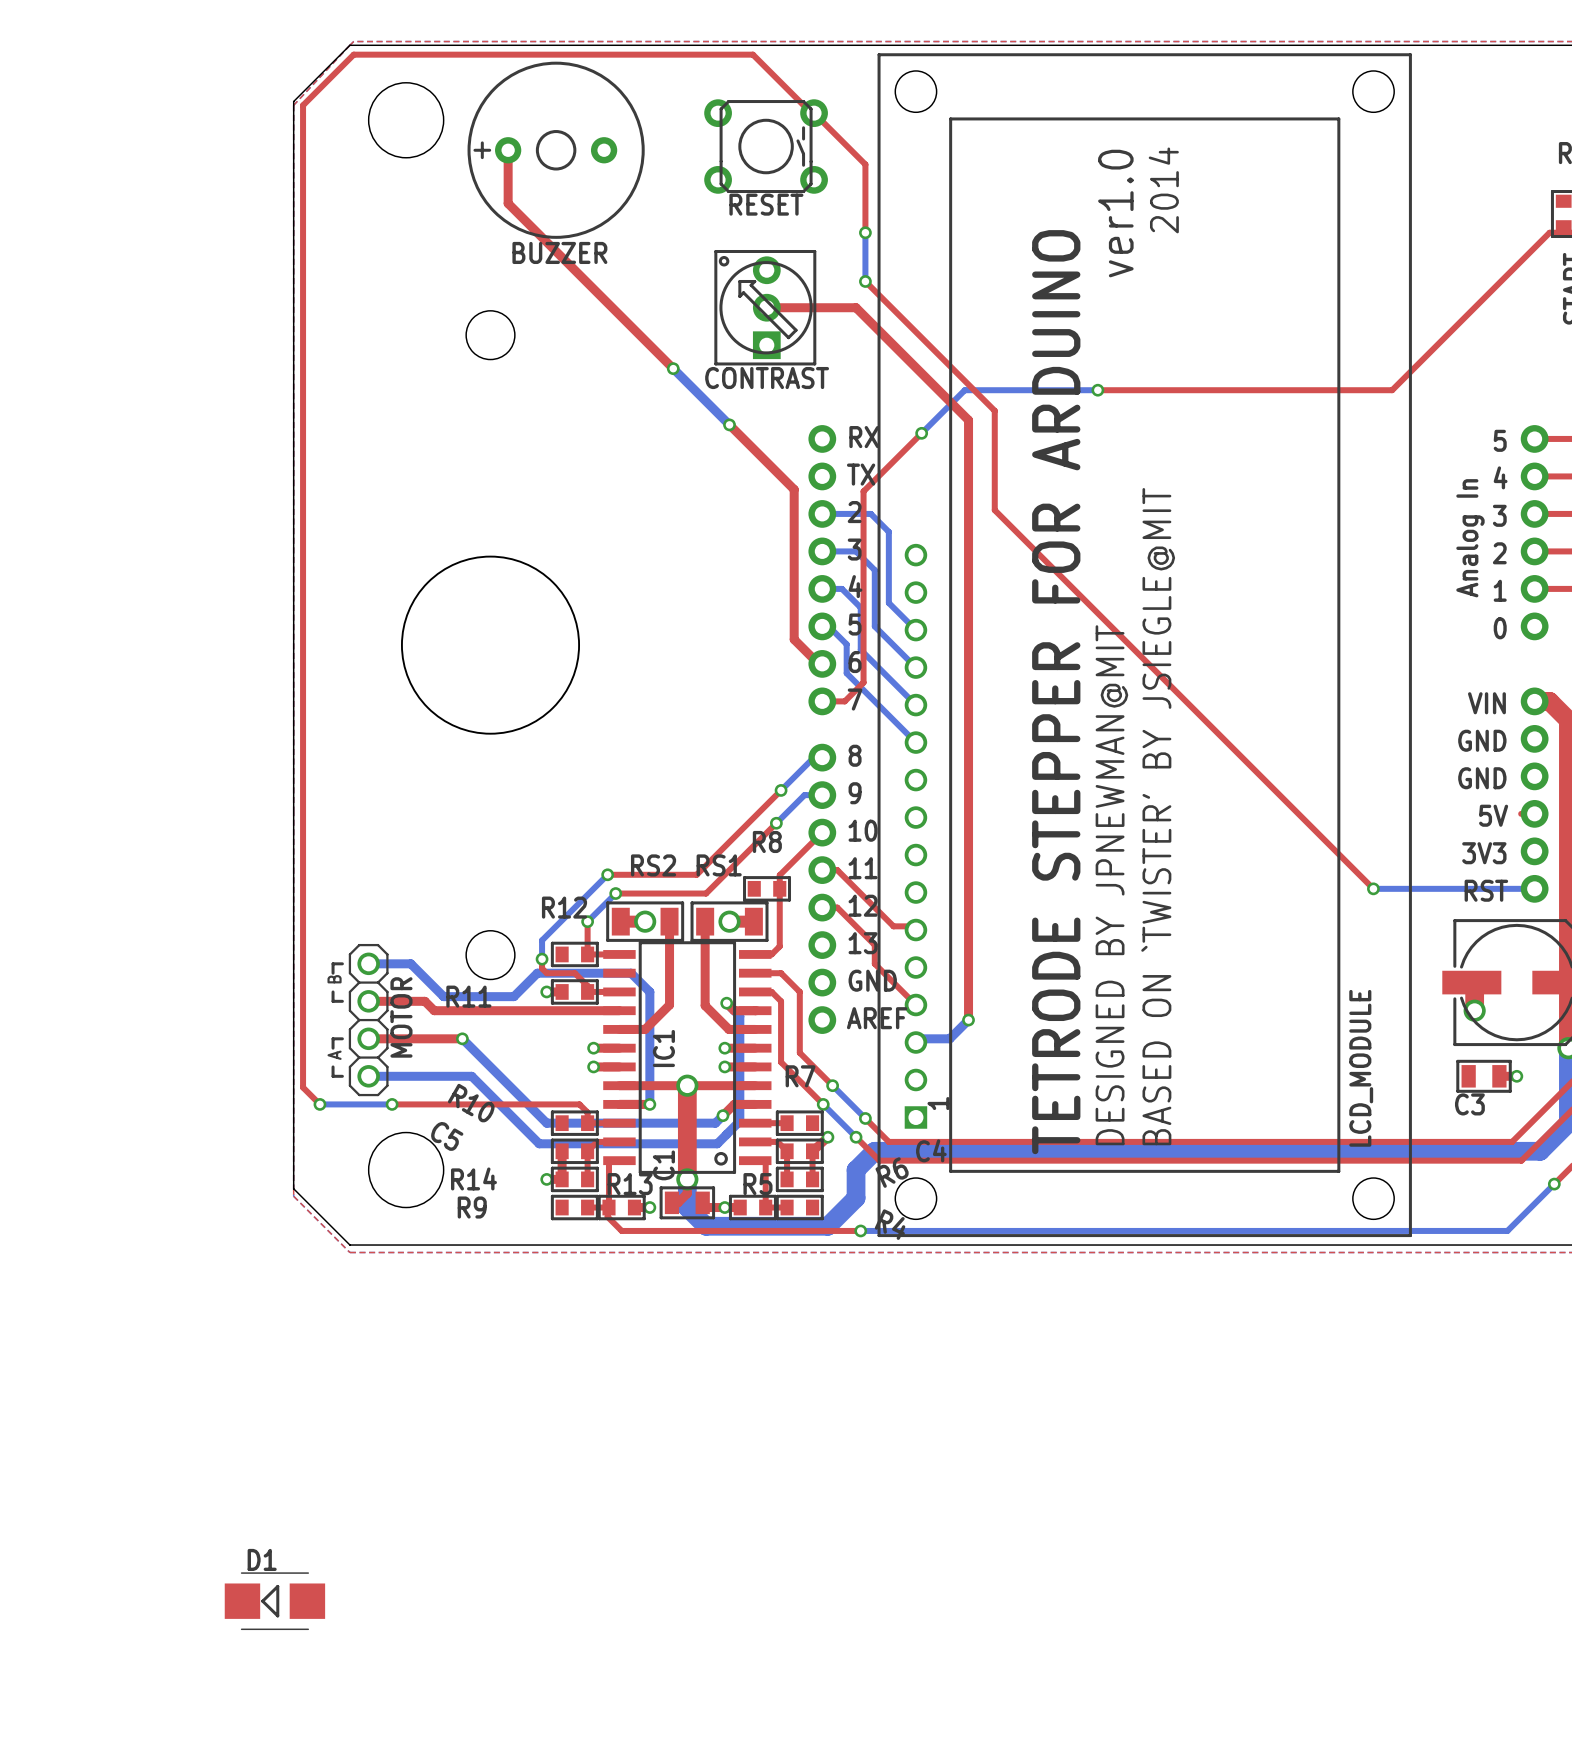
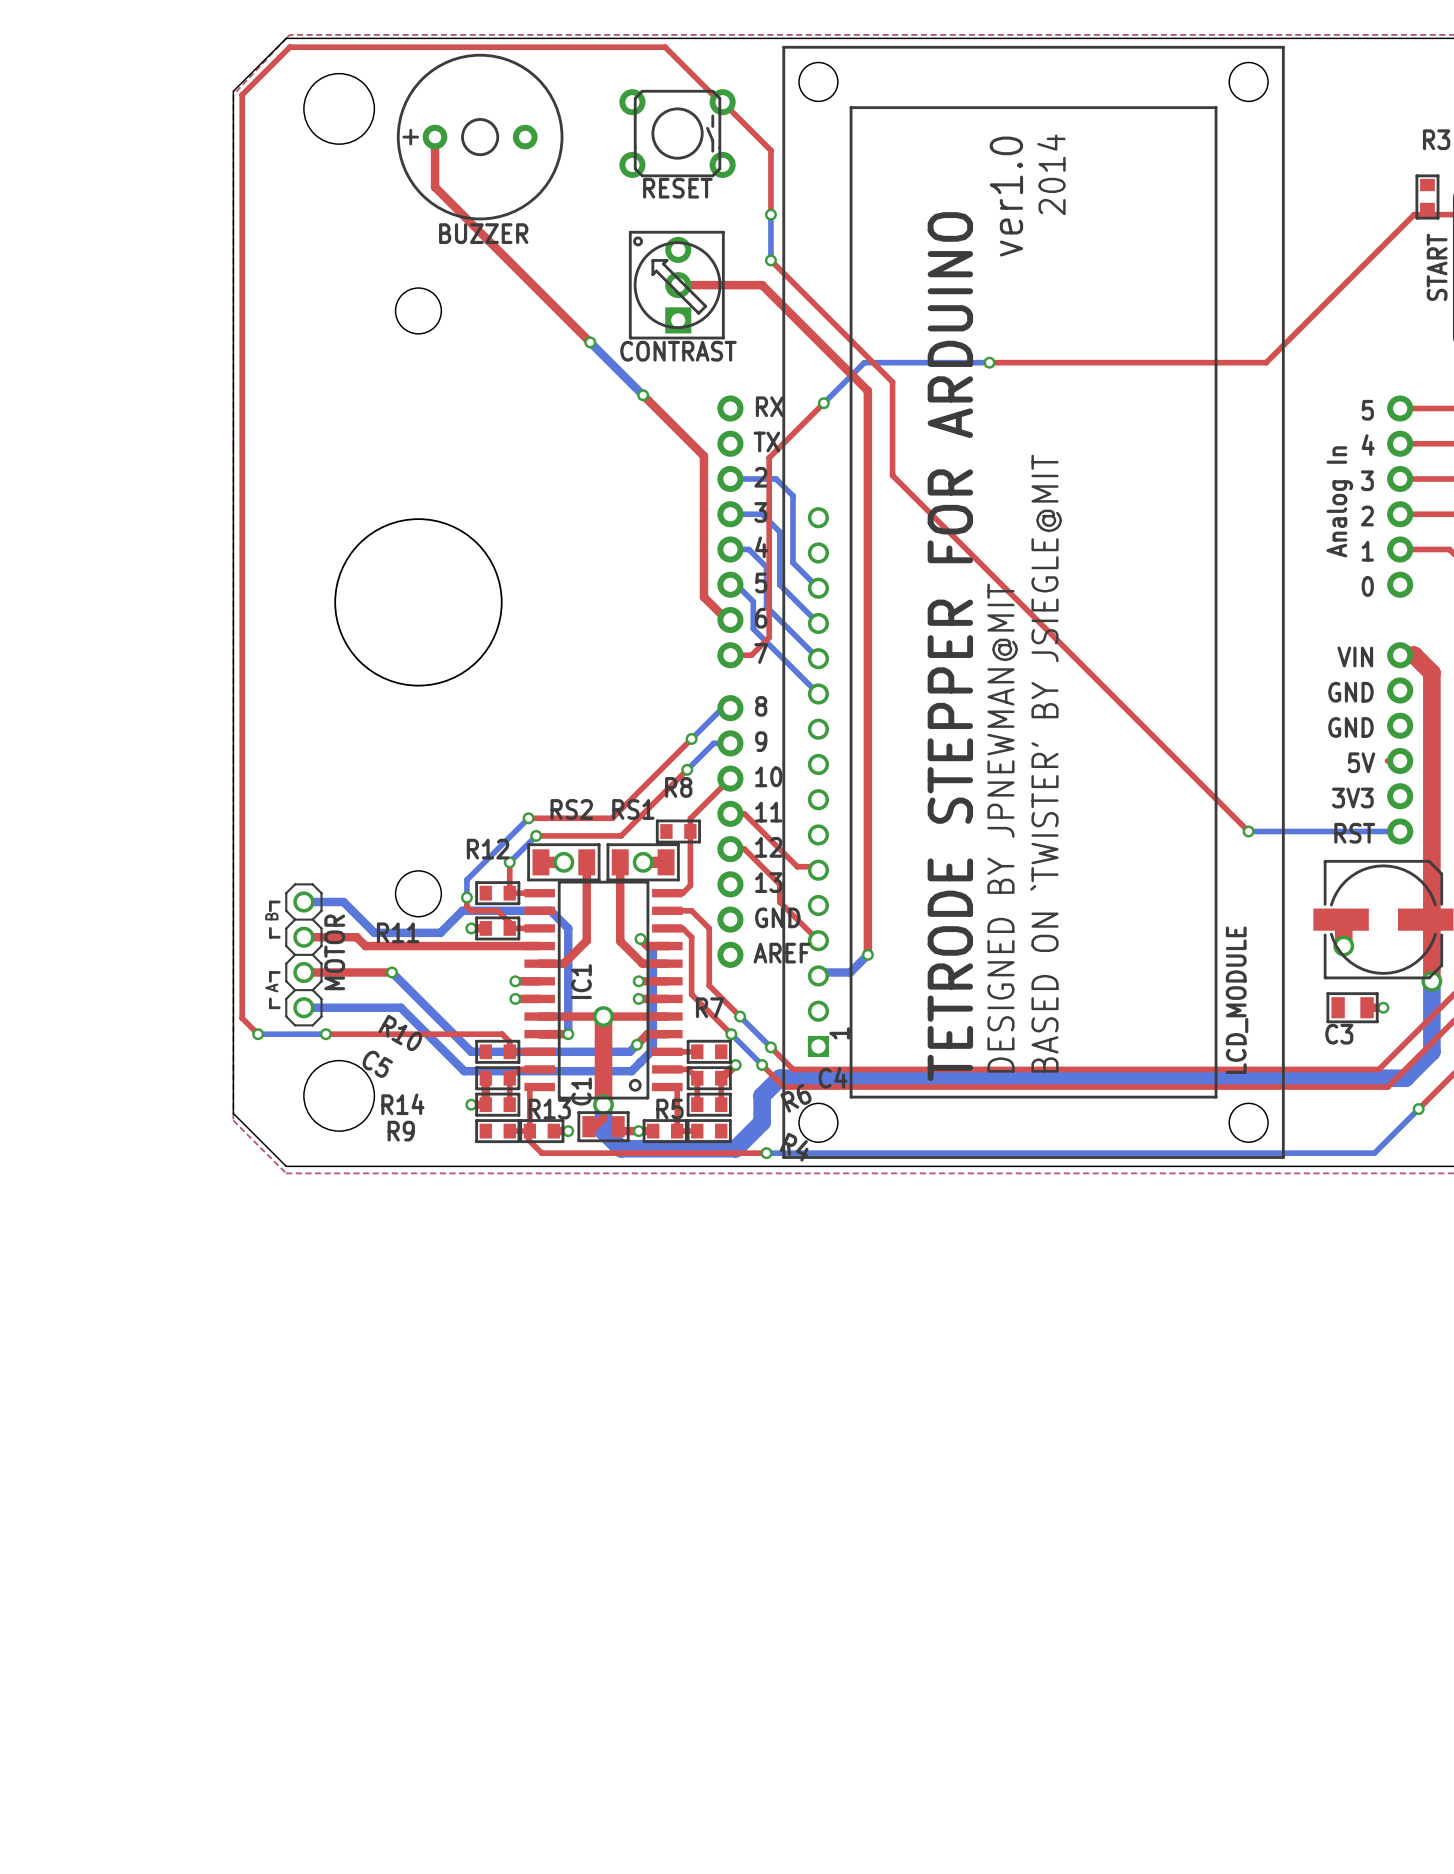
D1: (274, 1601) -> none

